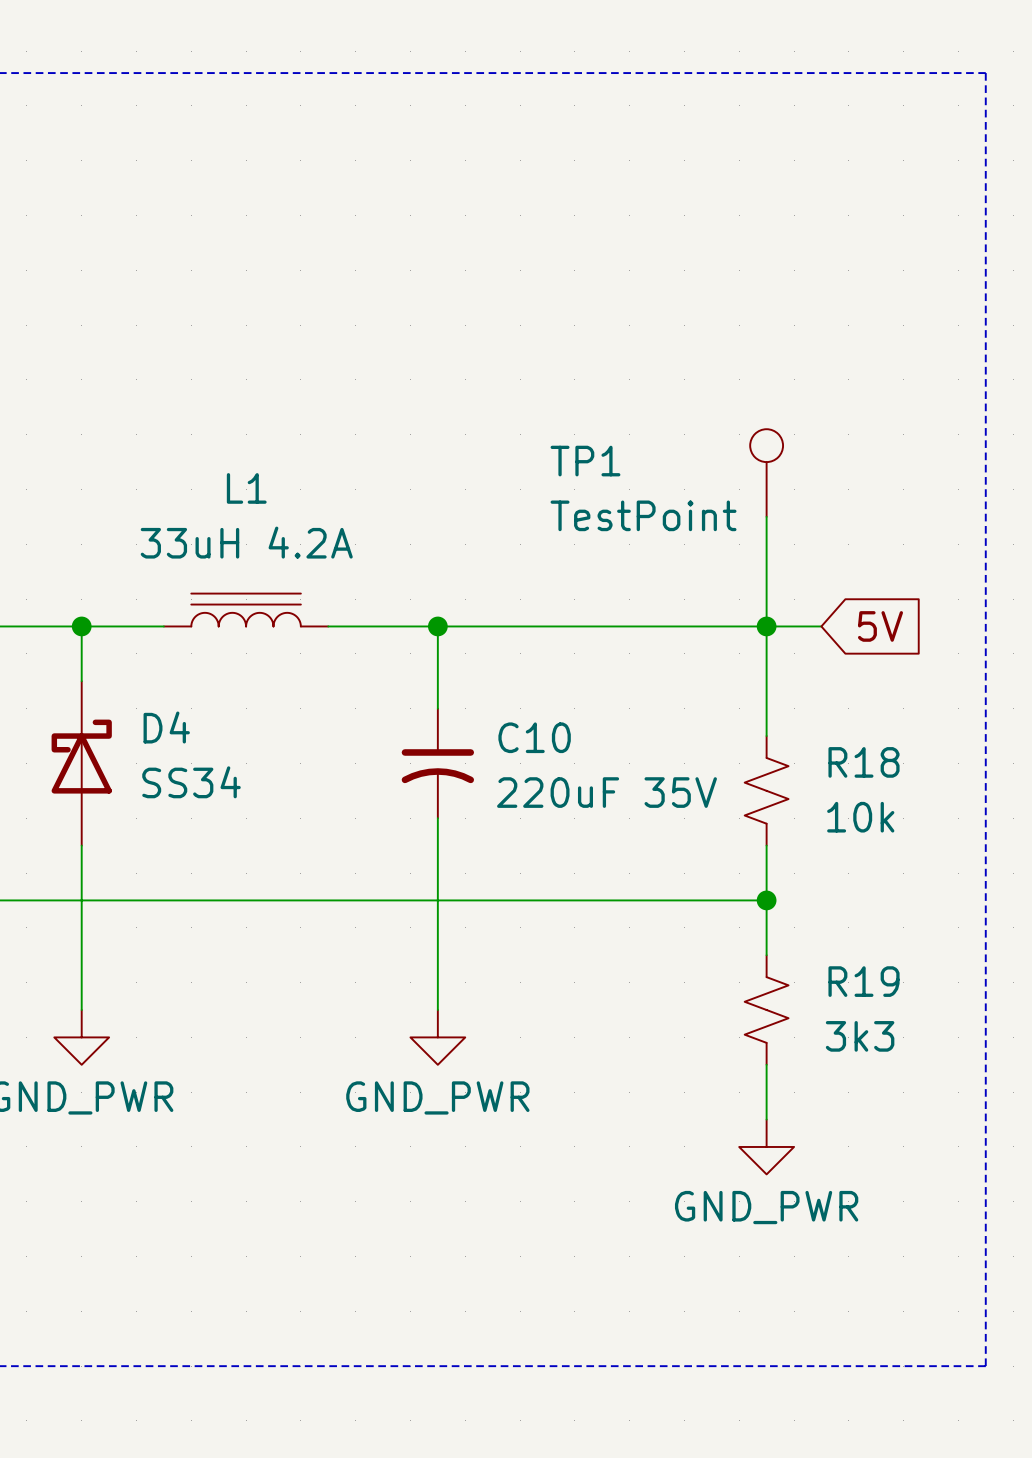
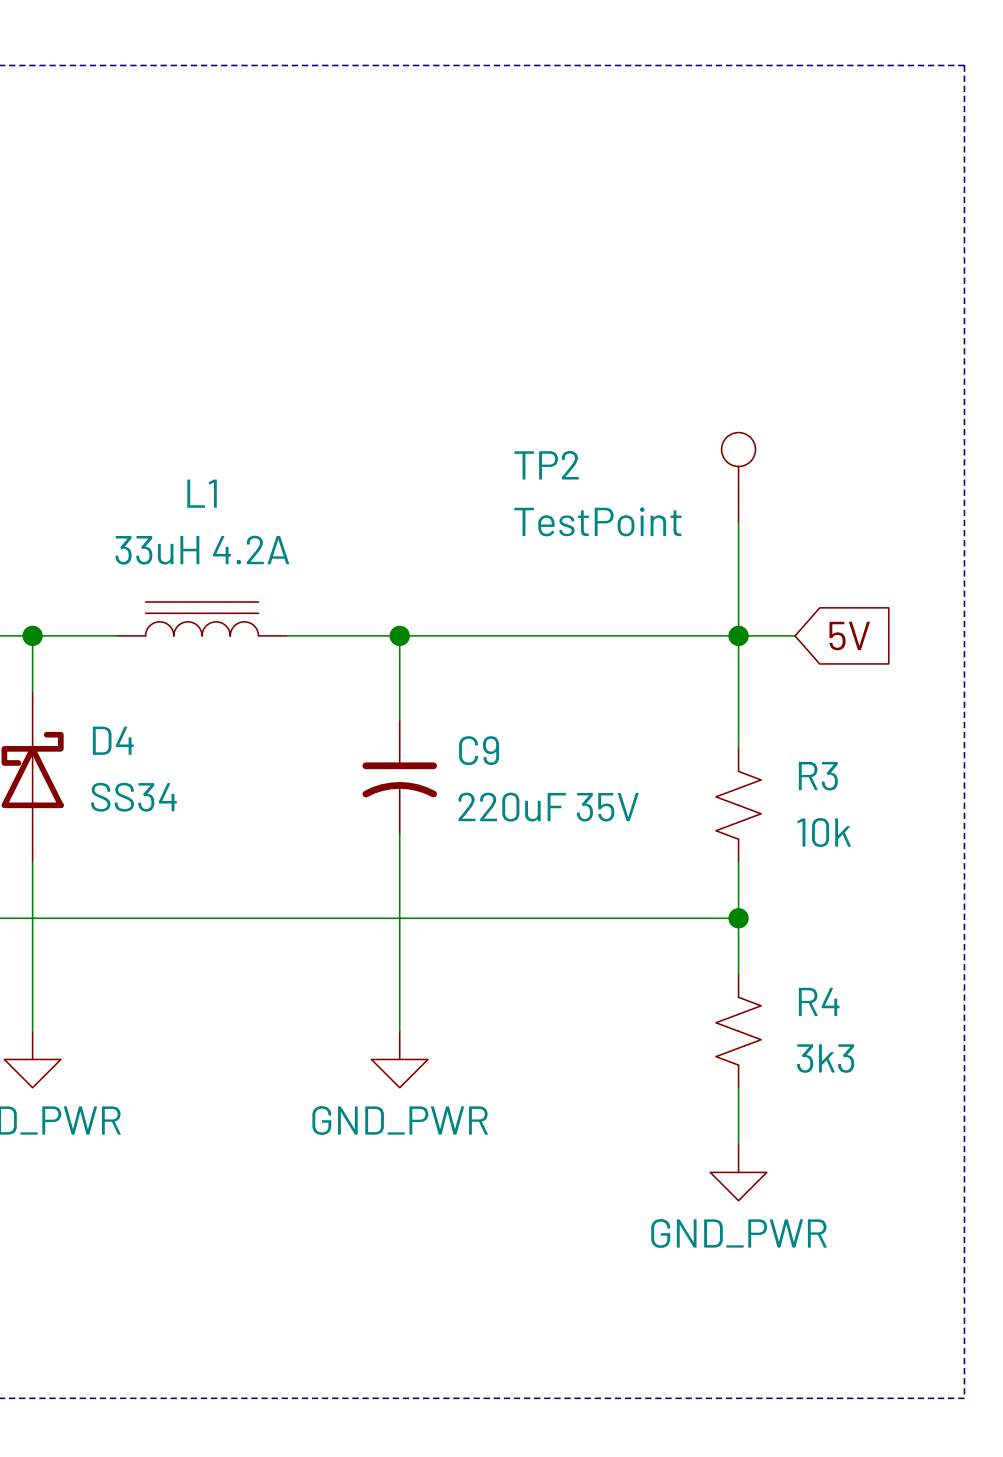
TP1 name: TP1 (585, 461) -> TP2 (546, 465)
C10 name: C10 (534, 737) -> C9 (479, 750)
R18 name: R18 (864, 762) -> R3 (818, 776)
R19 name: R19 (864, 981) -> R4 (819, 1001)

